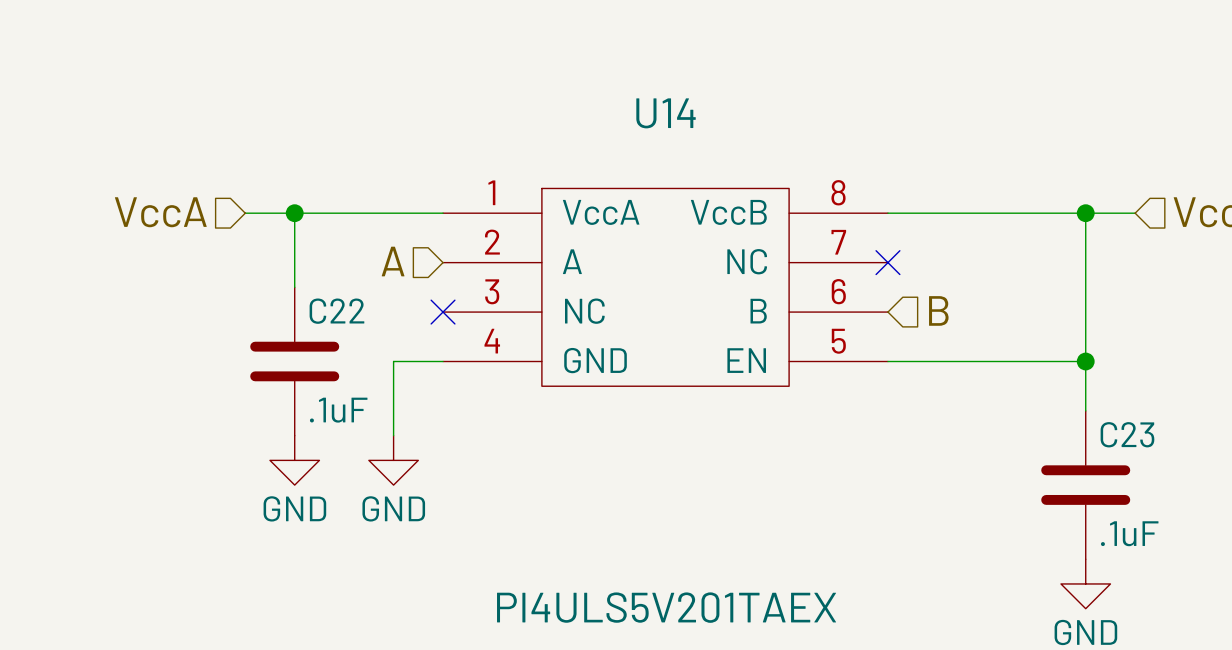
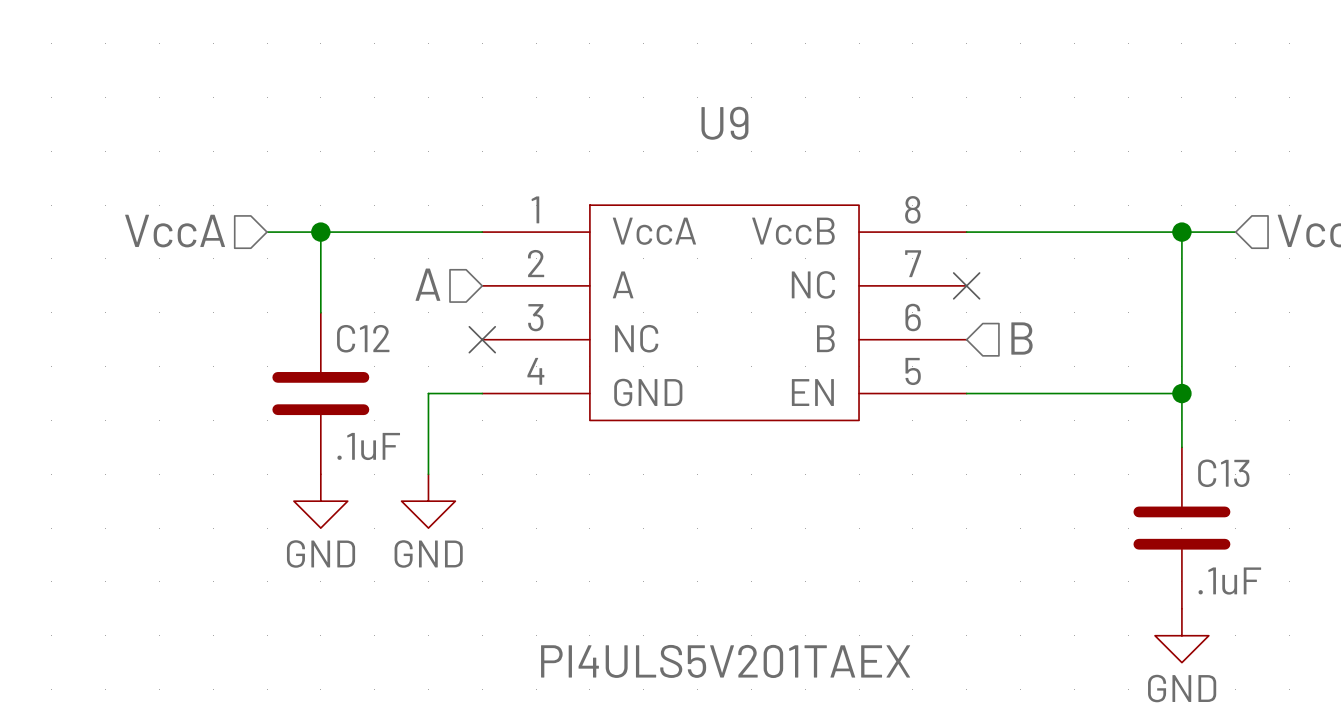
U14 name: U14 (666, 113) -> U9 (724, 123)
C22 name: C22 (336, 311) -> C12 (363, 338)
C23 name: C23 (1127, 434) -> C13 (1223, 473)

